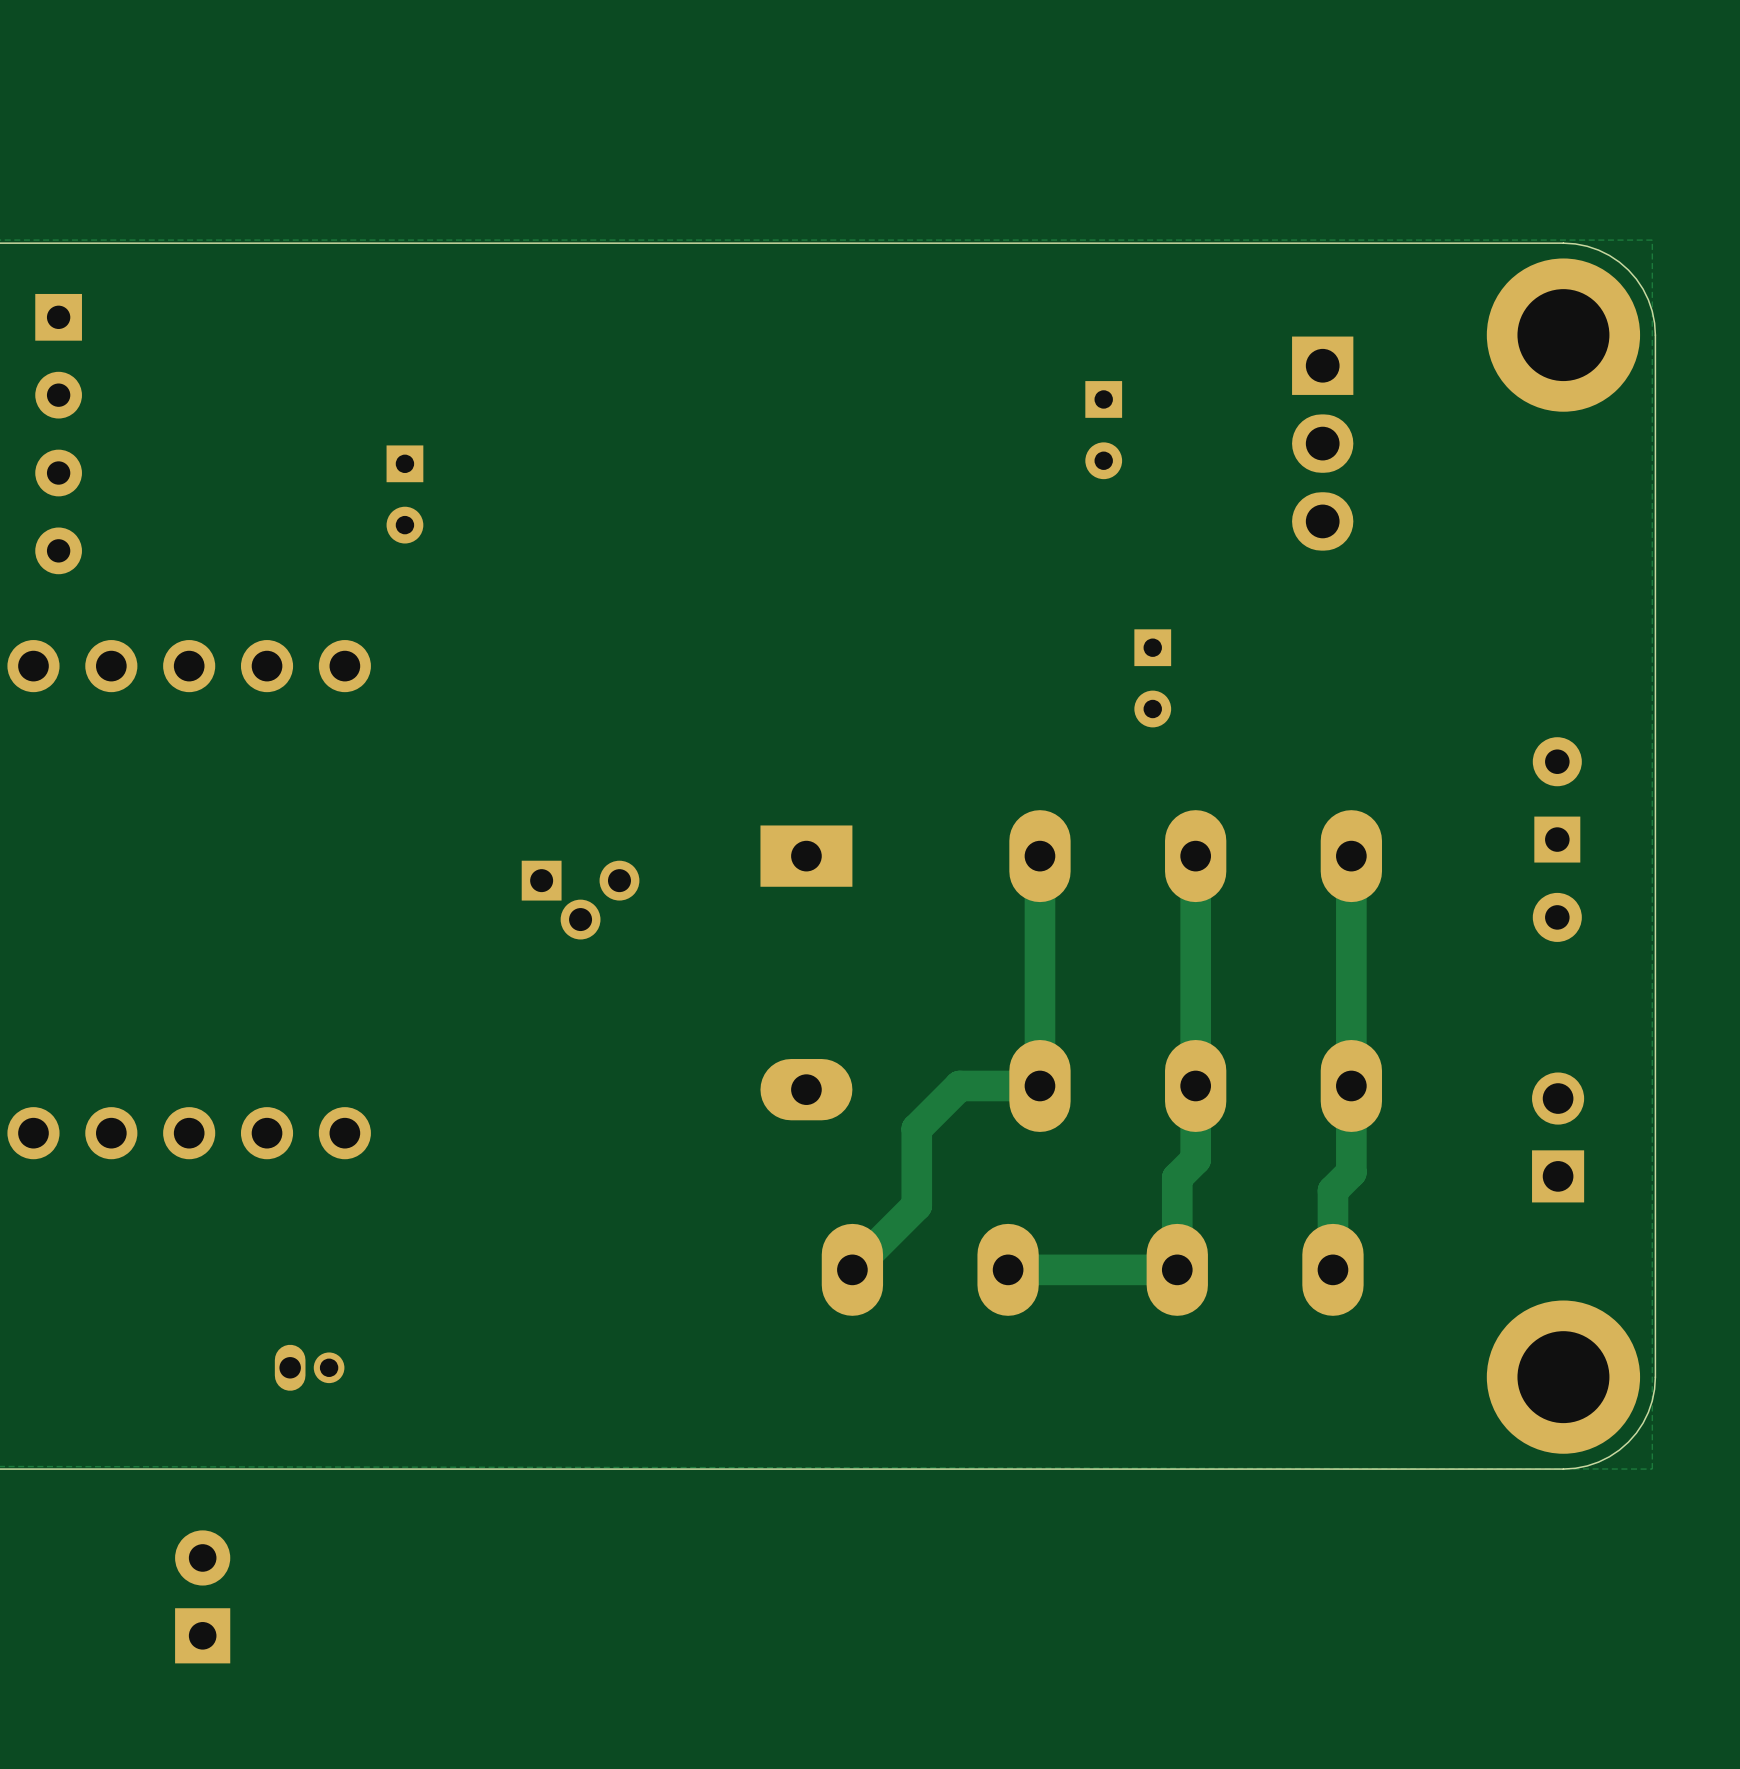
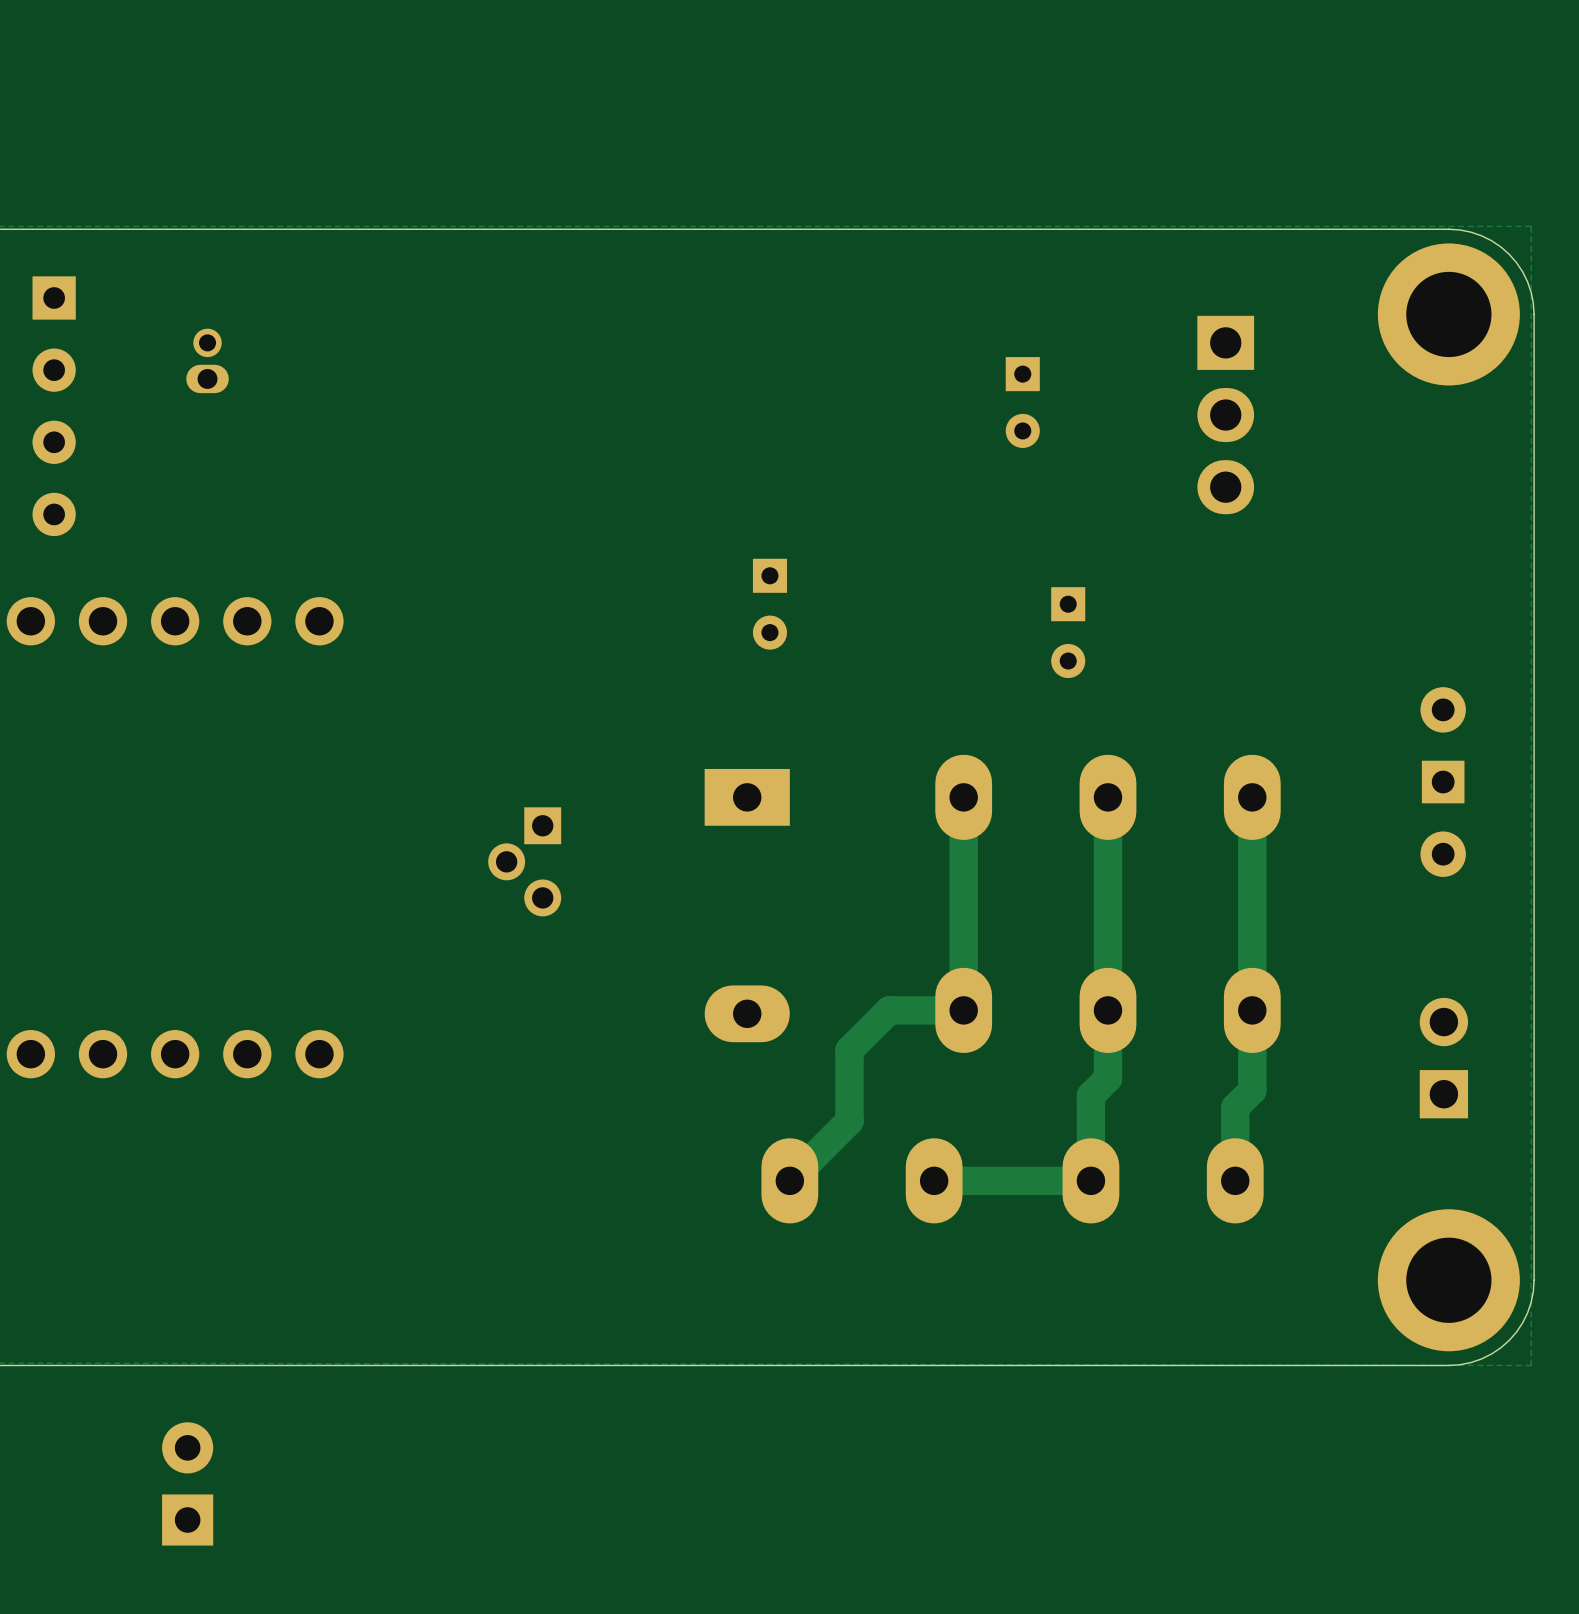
part: none -> (207, 360)
part position: (404, 494) -> (769, 604)
part rotation: 0° (580, 900) -> 90° clockwise (524, 861)
part: (309, 1367) -> none

